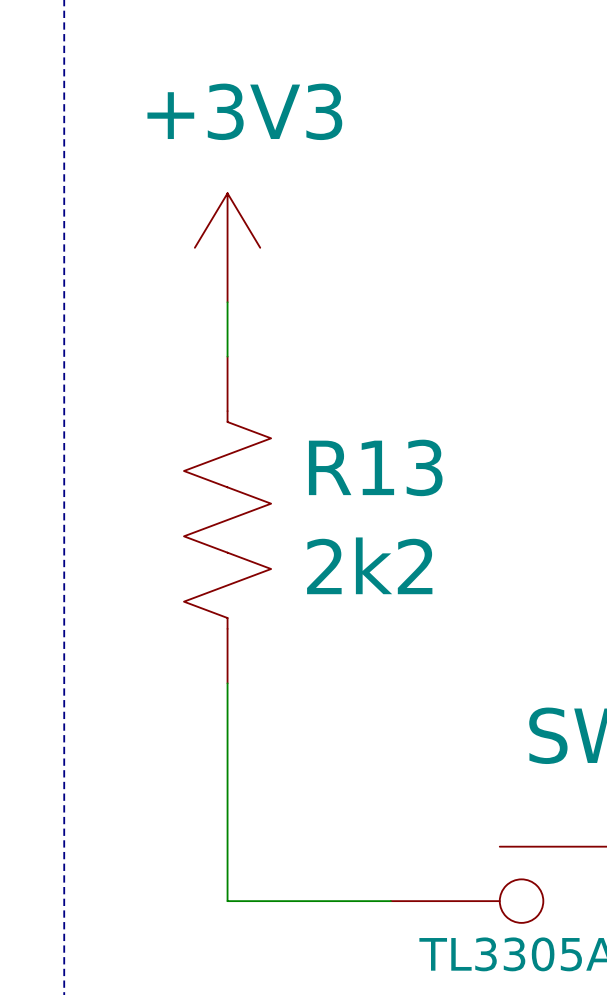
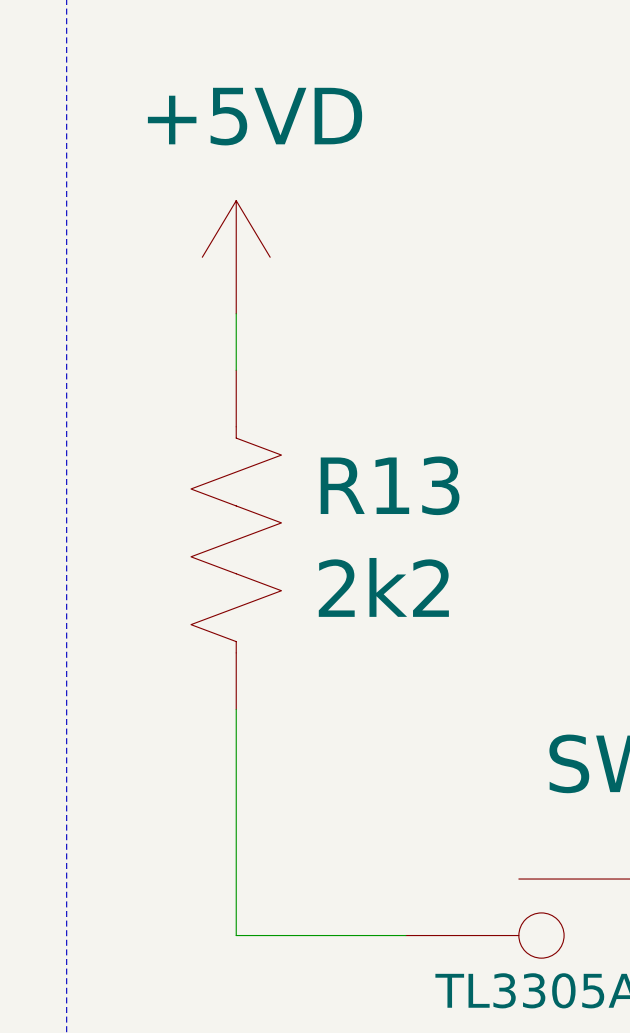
power symbol: +3V3 (227, 247) -> +5VD (236, 257)

